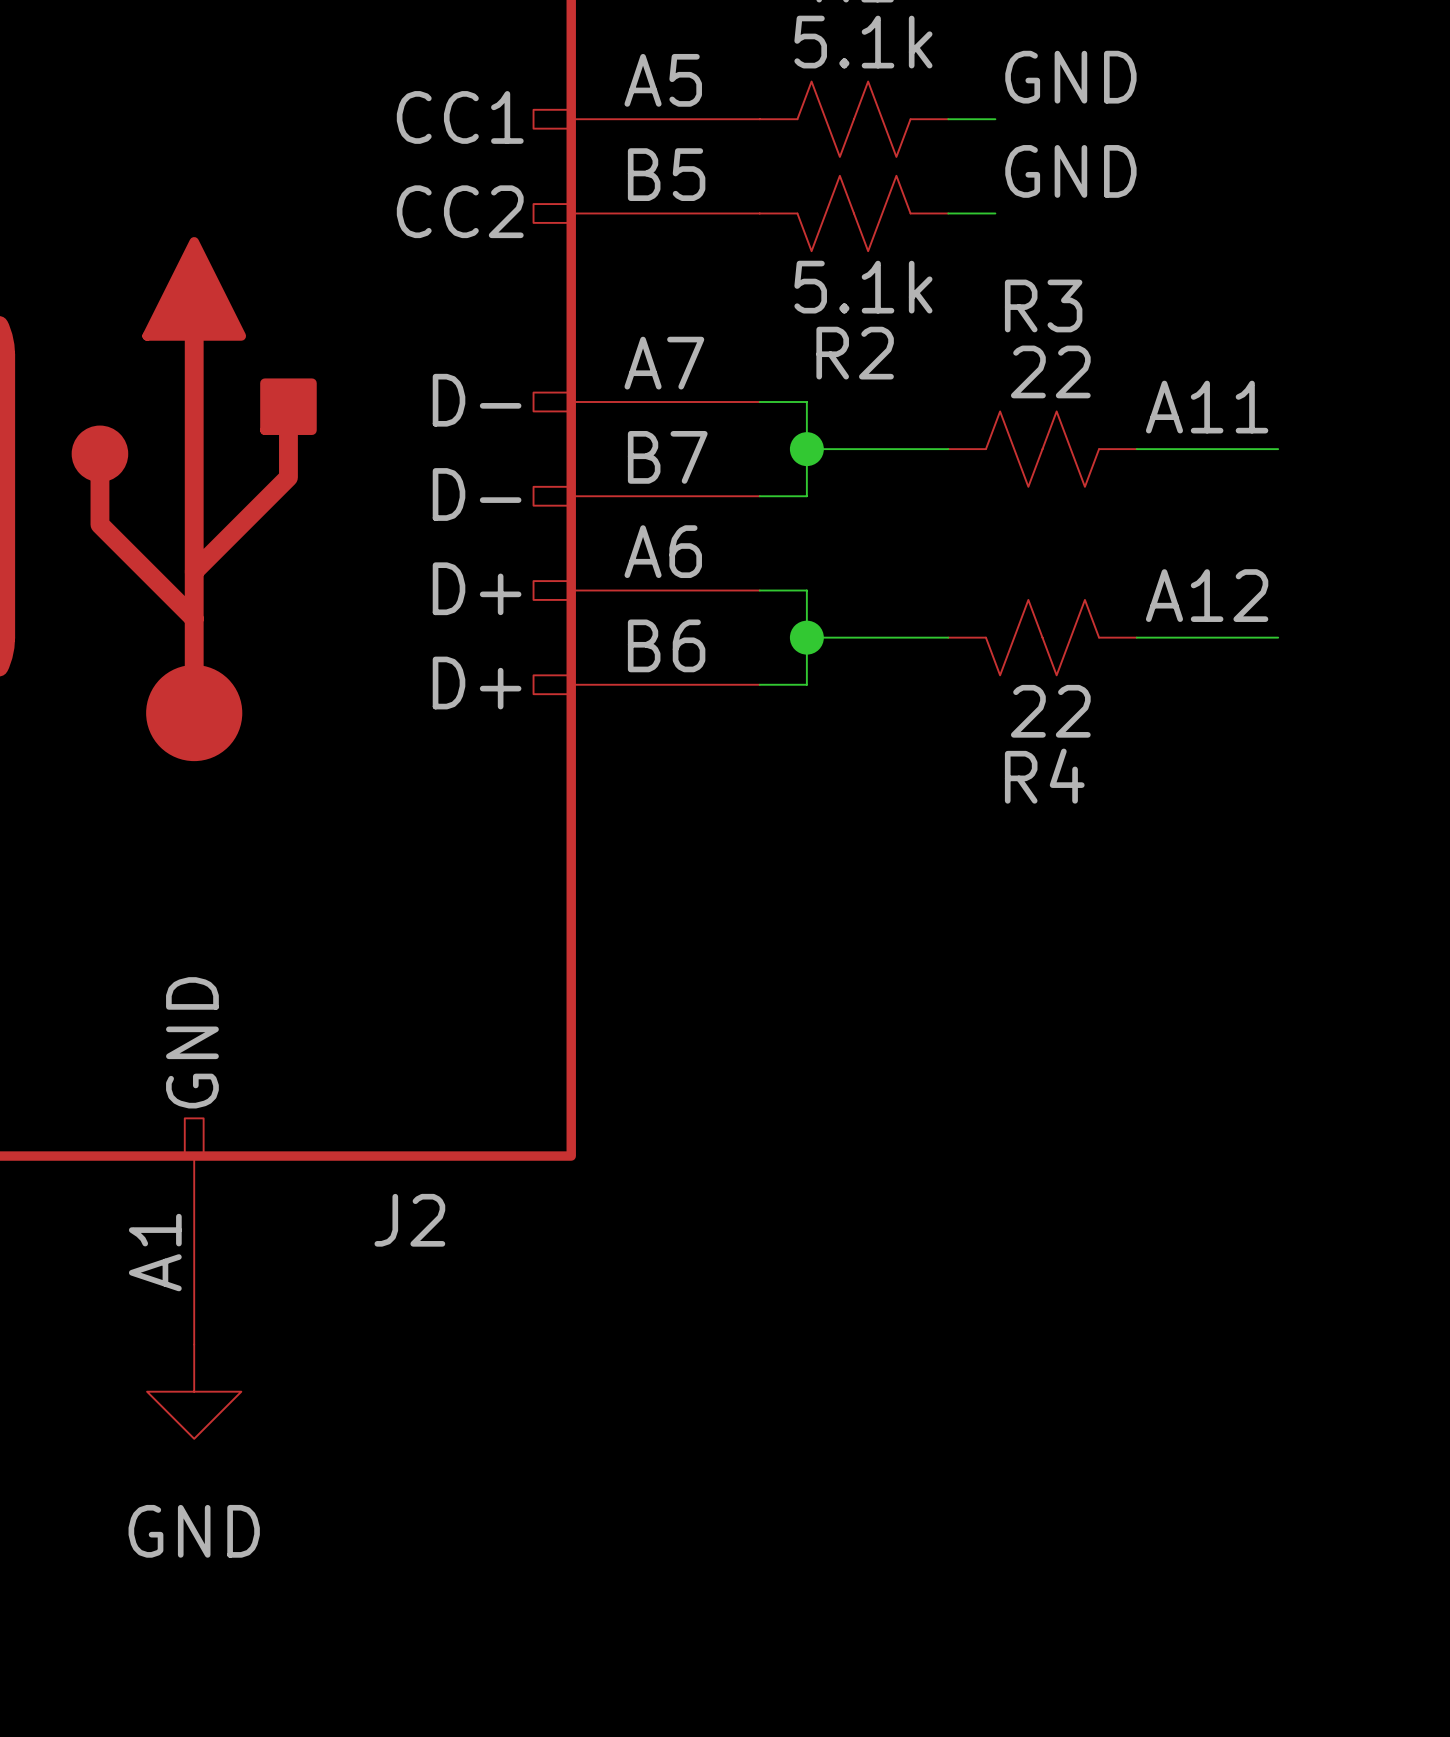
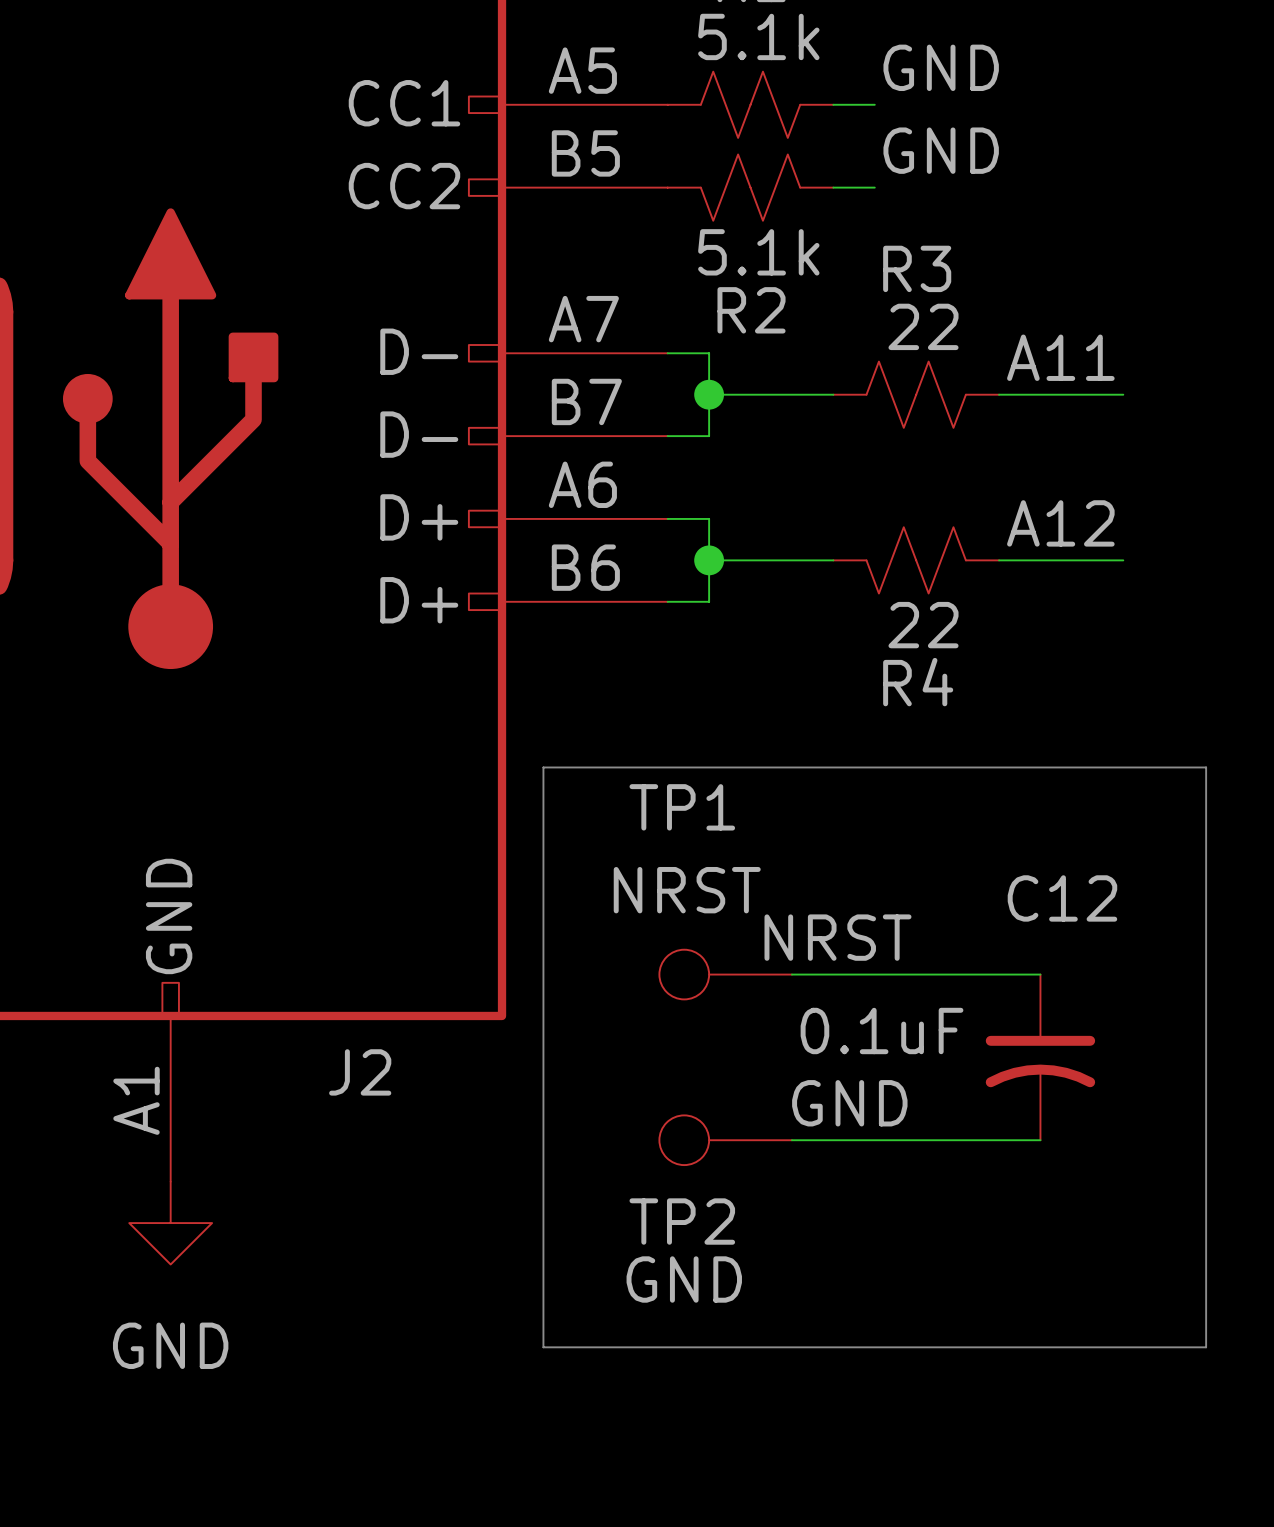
line: none -> (543, 767) (1206, 767) (1206, 1347) (543, 1347) (543, 767)
label: none -> NRST (837, 937)
TP1: none -> NRST (725, 974)
wire: none -> (791, 974) (1040, 974)
C12: none -> 0.1uF (1040, 1057)
label: none -> GND (849, 1103)
TP2: none -> GND (725, 1140)
wire: none -> (791, 1140) (1040, 1140)

